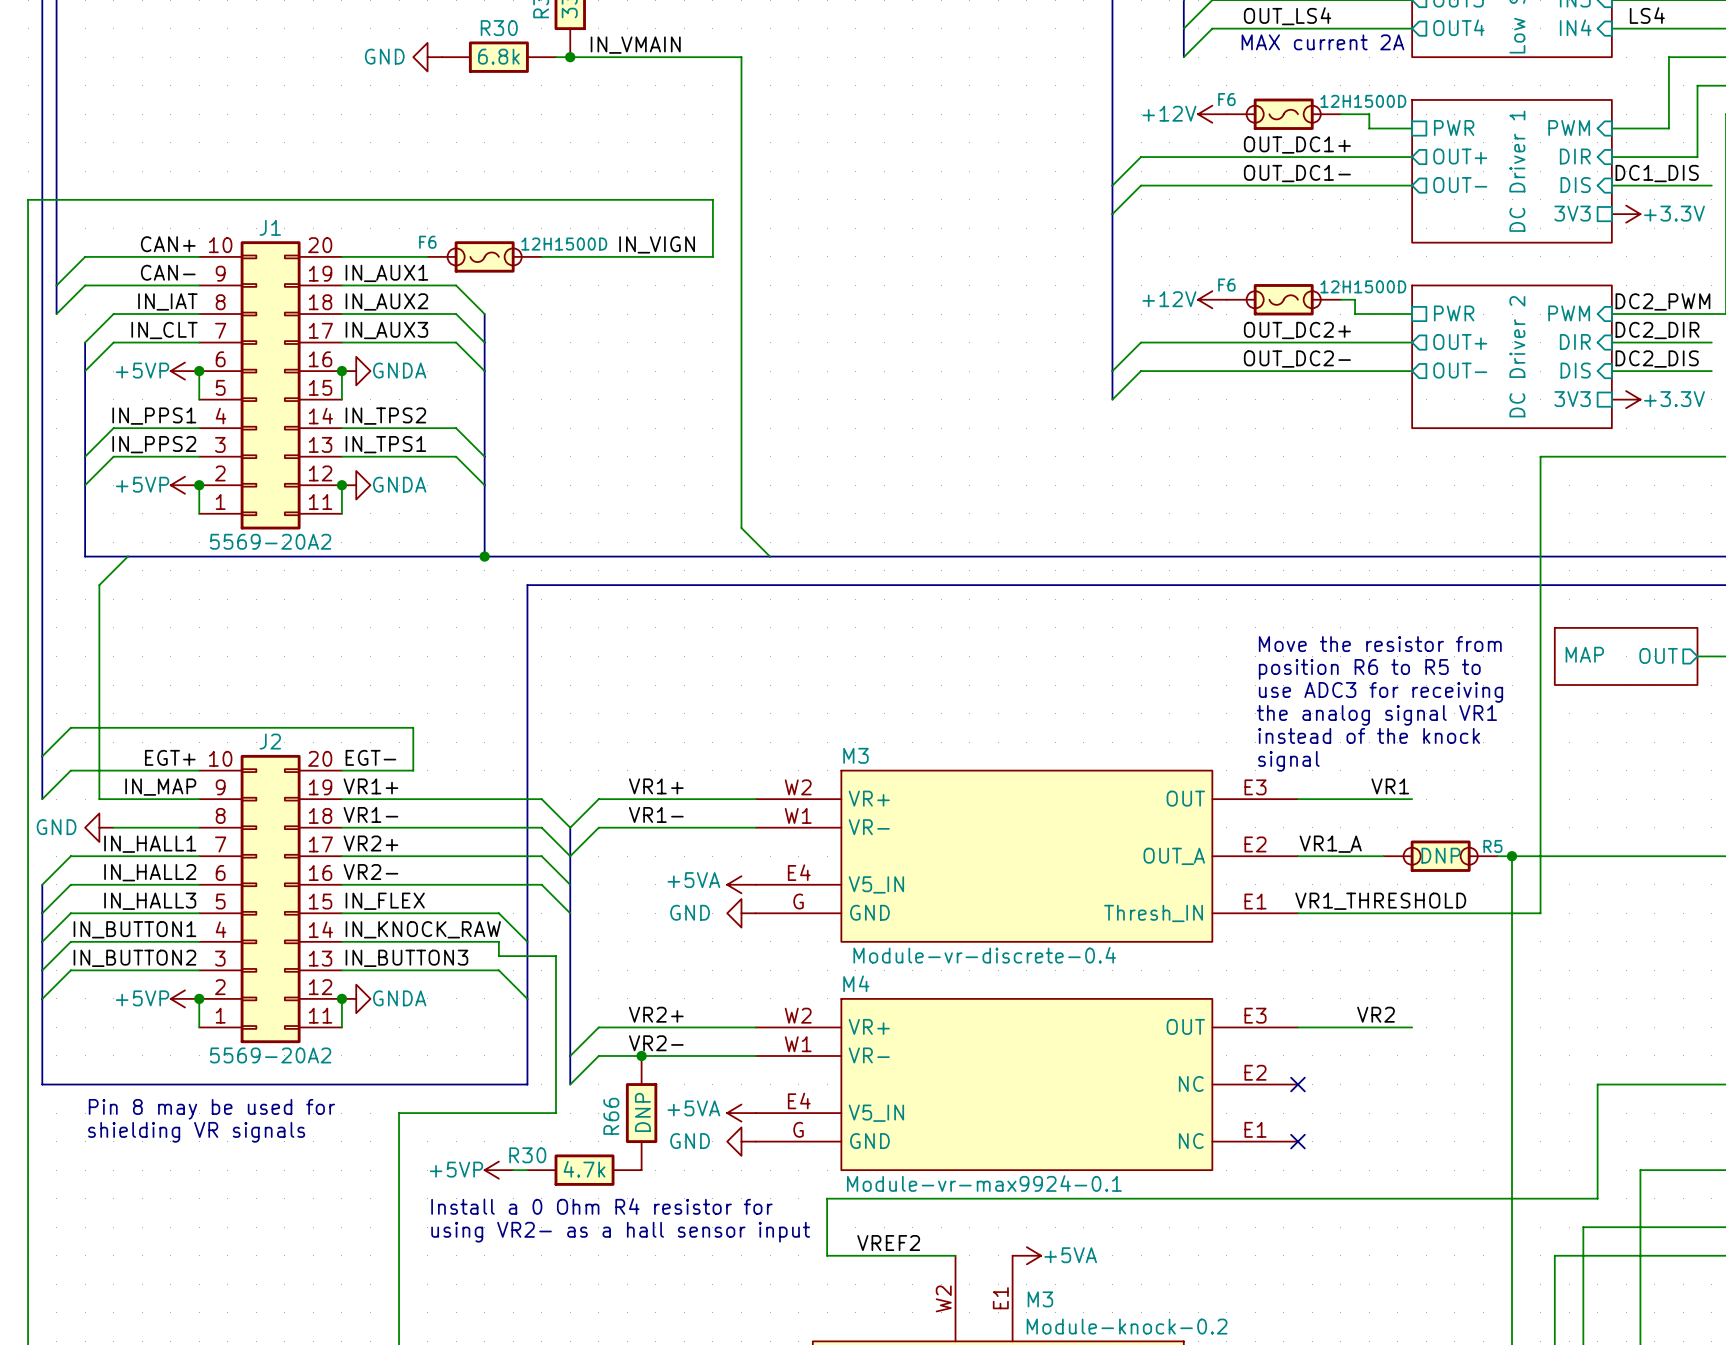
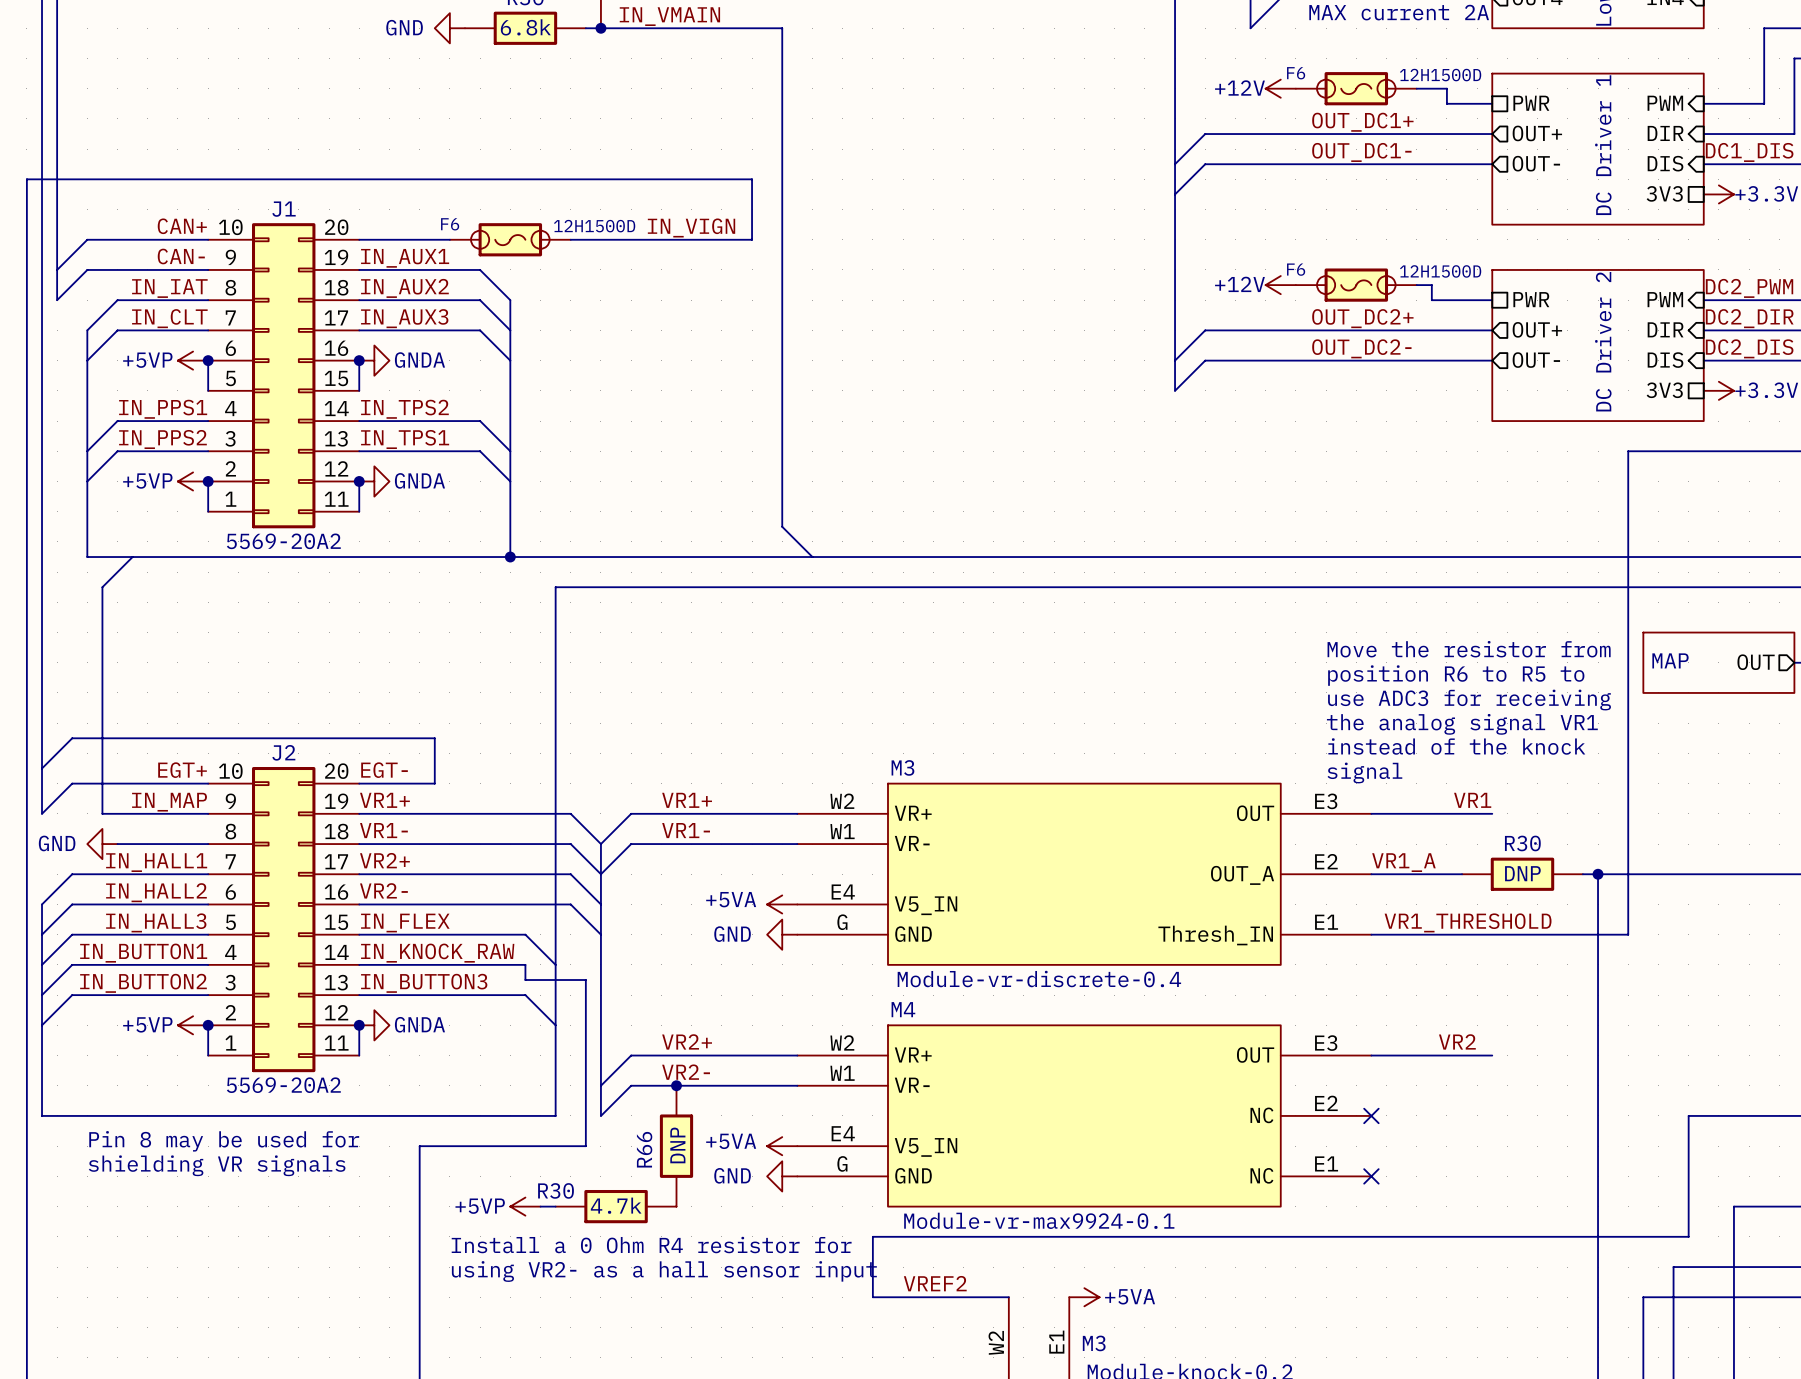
R5: (1440, 856) -> none
R30: none -> (1522, 874)

